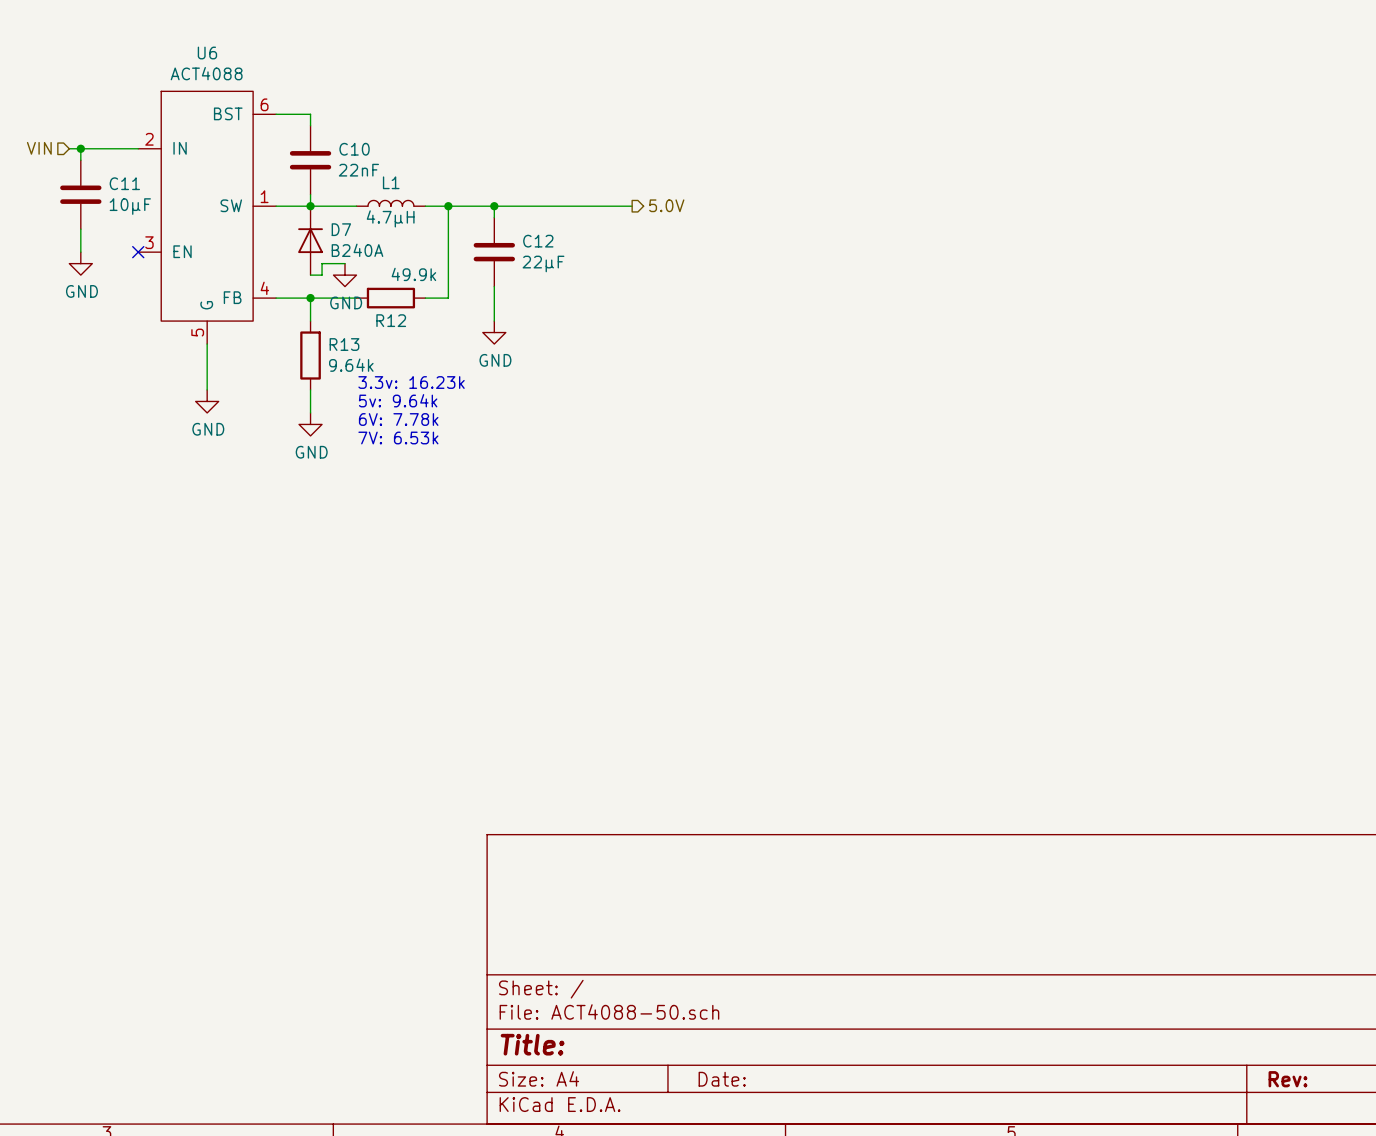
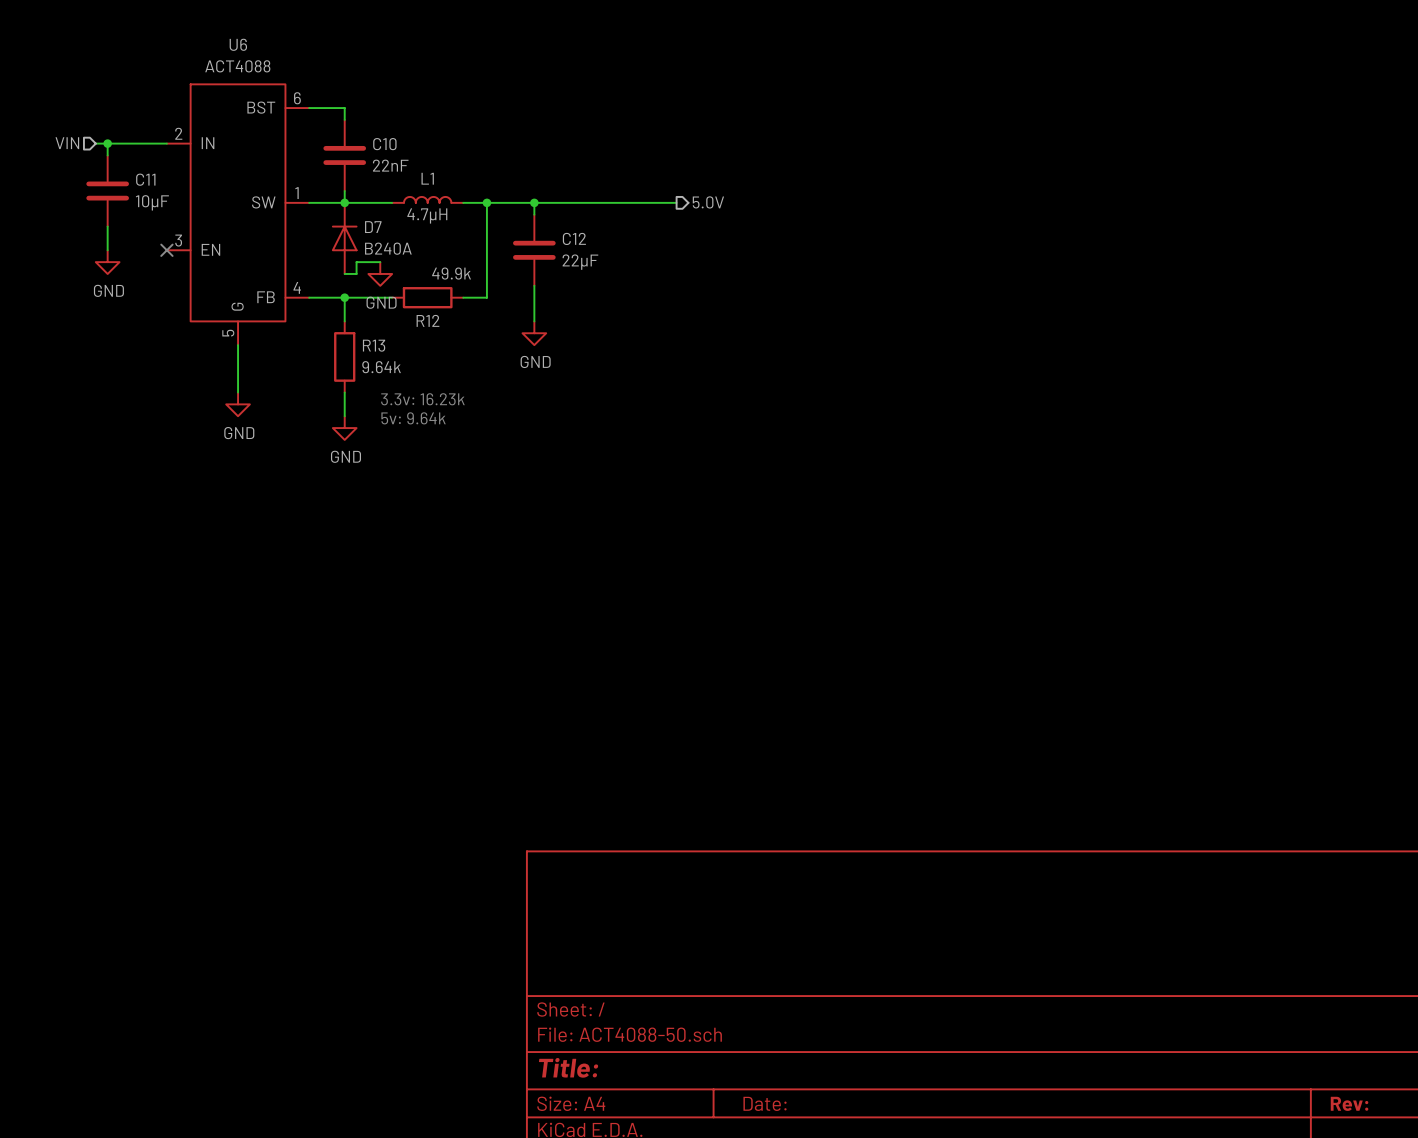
text position: 3.3v: 16.23k (411, 382) -> 3.3v: 16.23k (422, 399)
text position: 5v: 9.64k (398, 400) -> 5v: 9.64k (413, 418)
text: 6V: 7.78k (398, 419) -> none
text: 7V: 6.53k (398, 437) -> none

